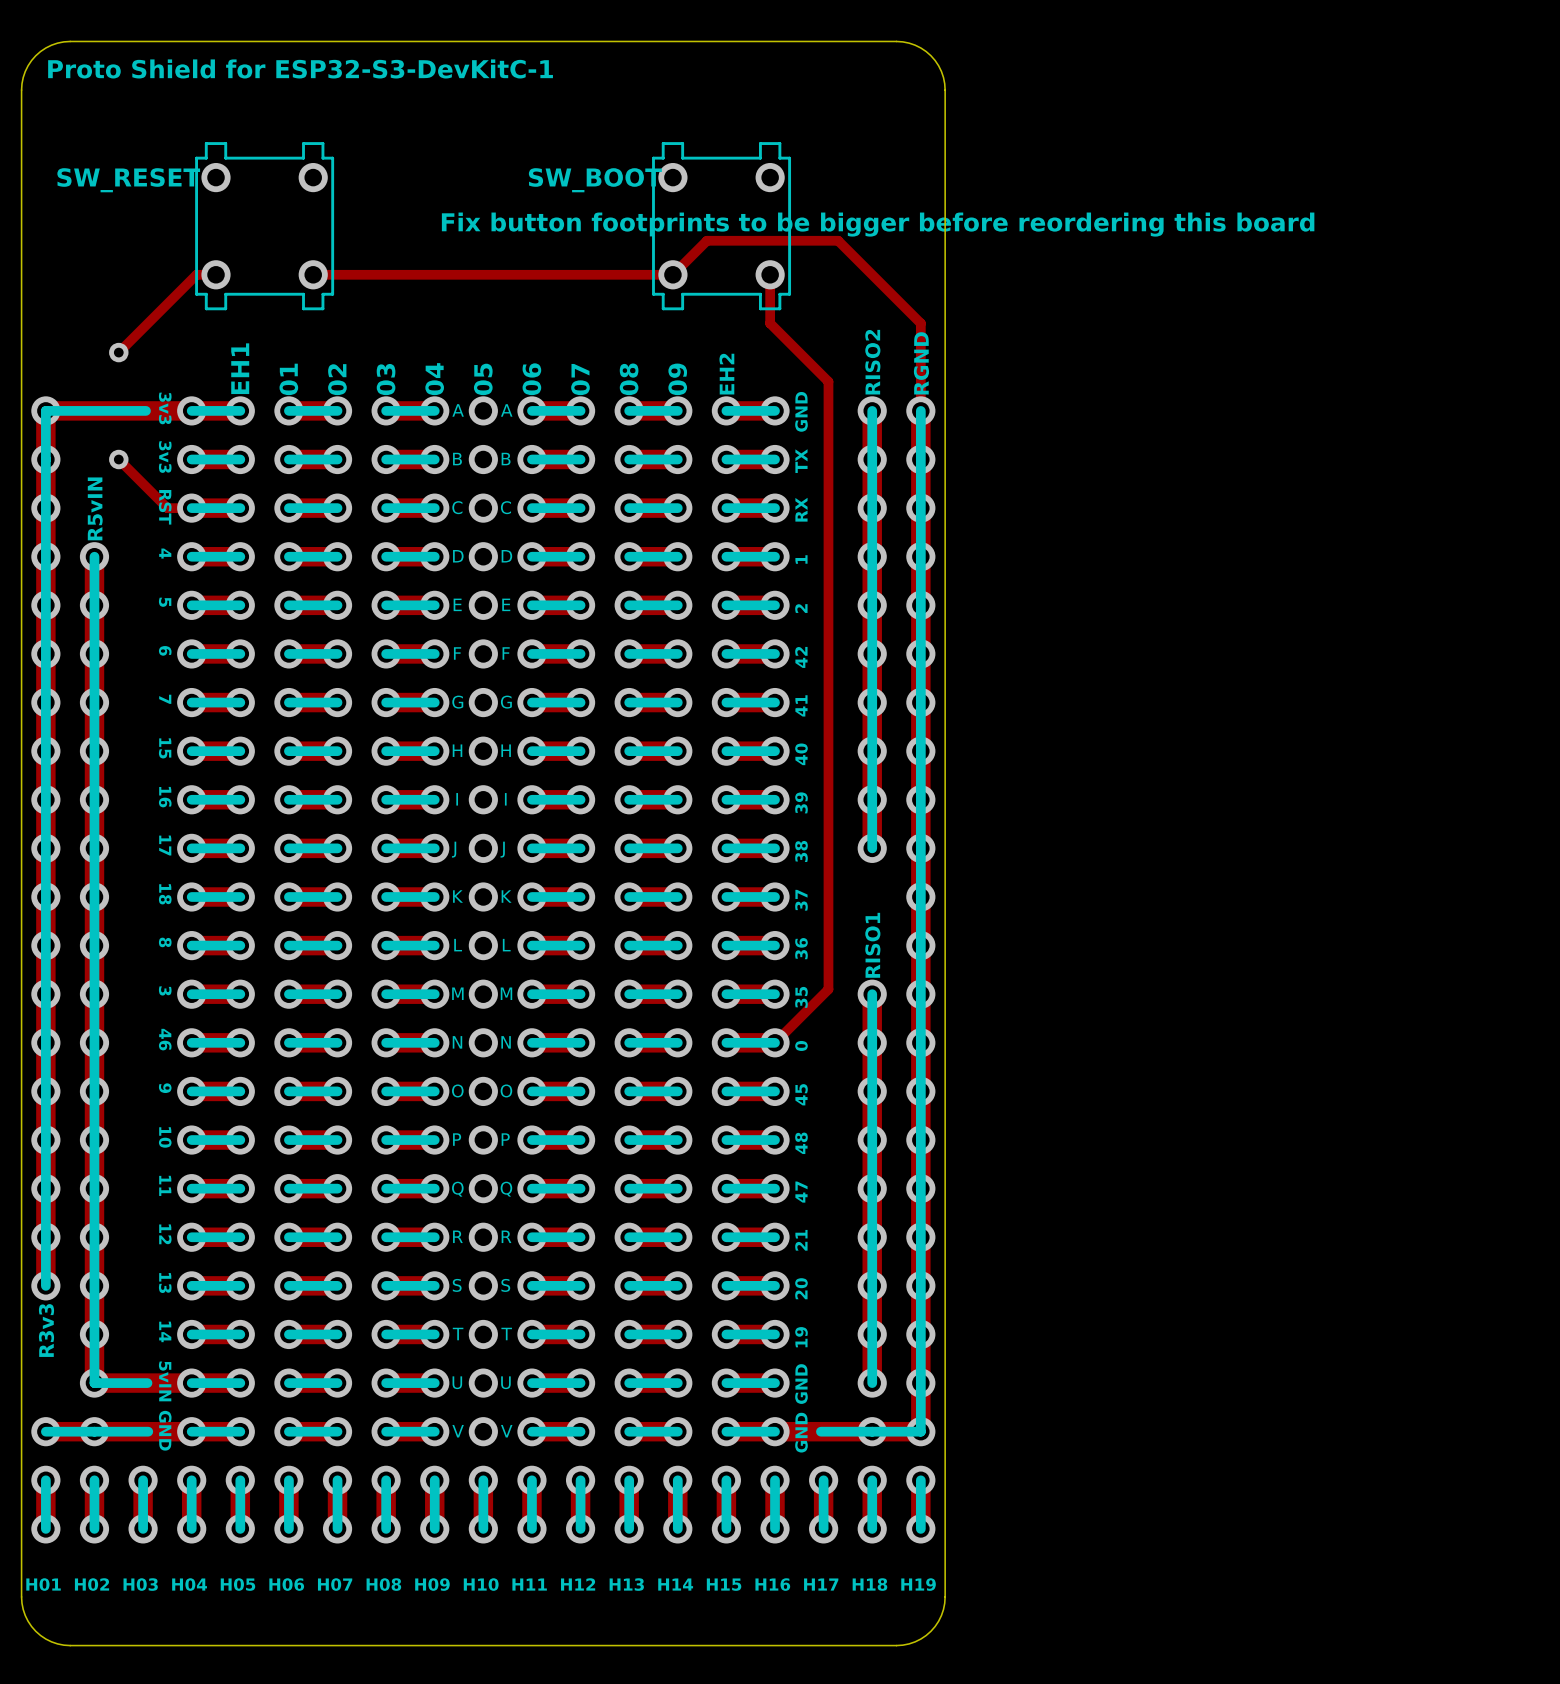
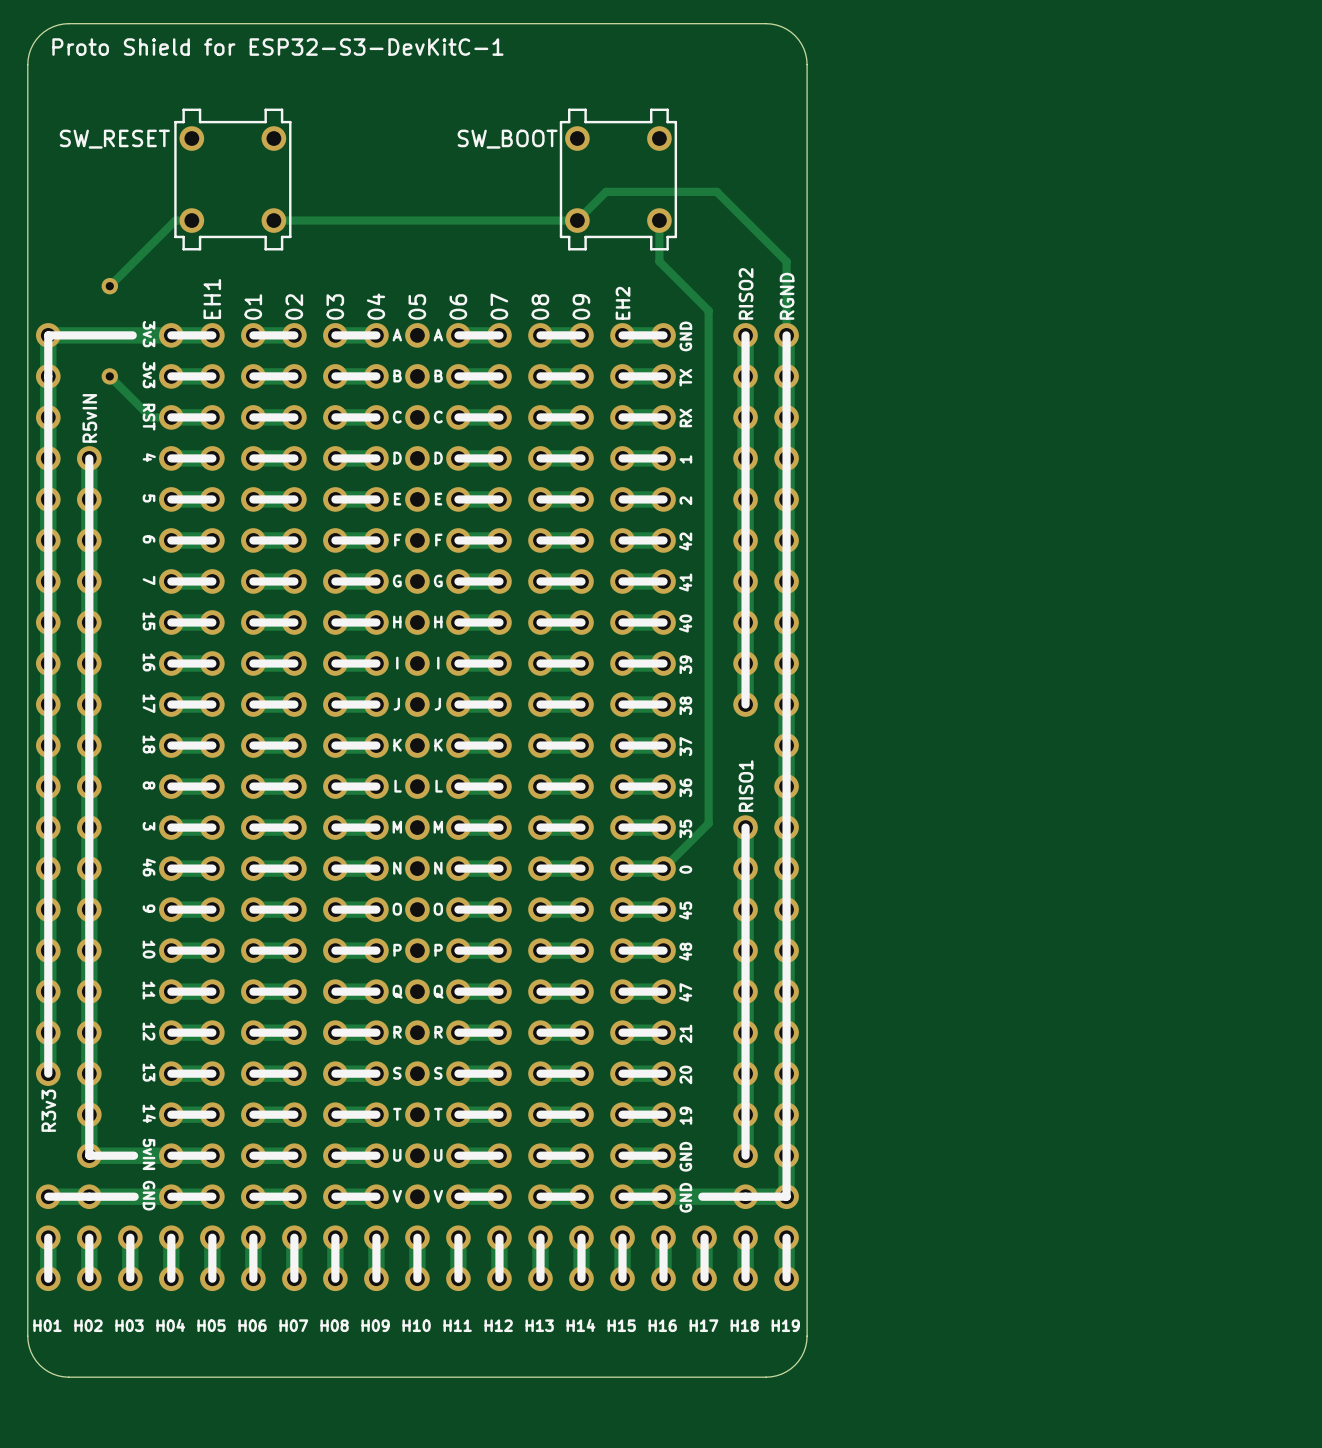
text: Fix button footprints to be bigger before reordering this board (878, 224) -> none

